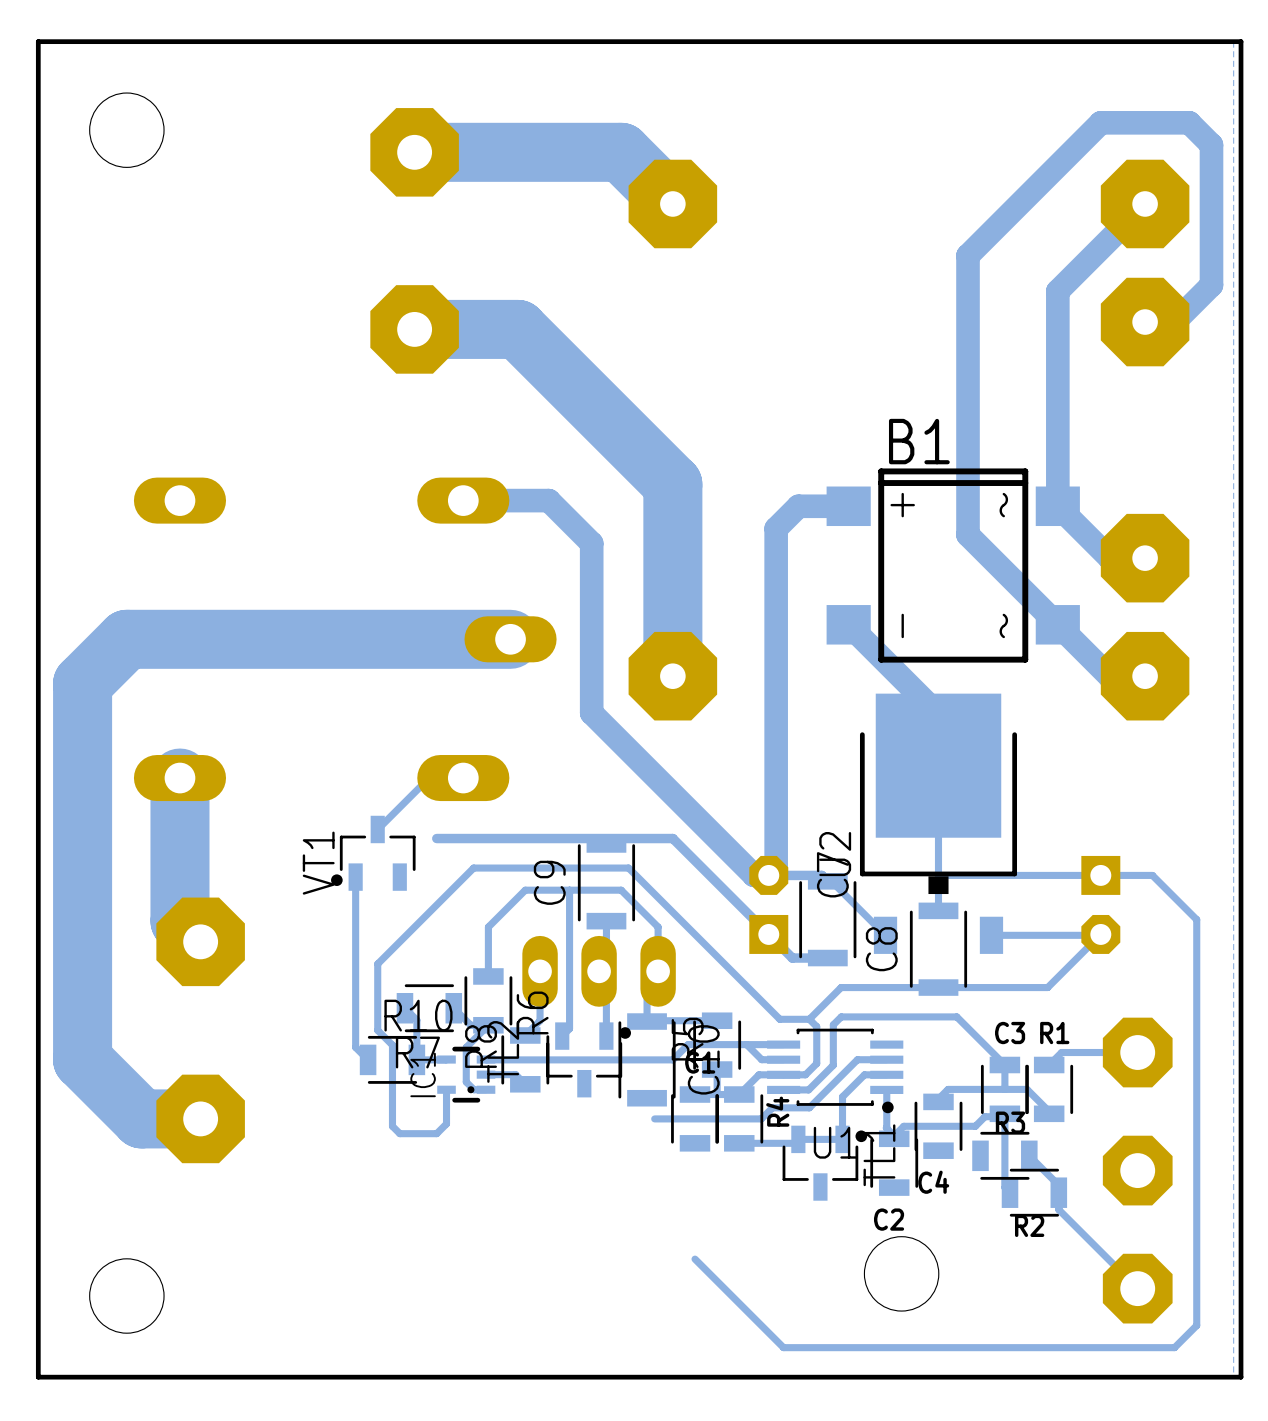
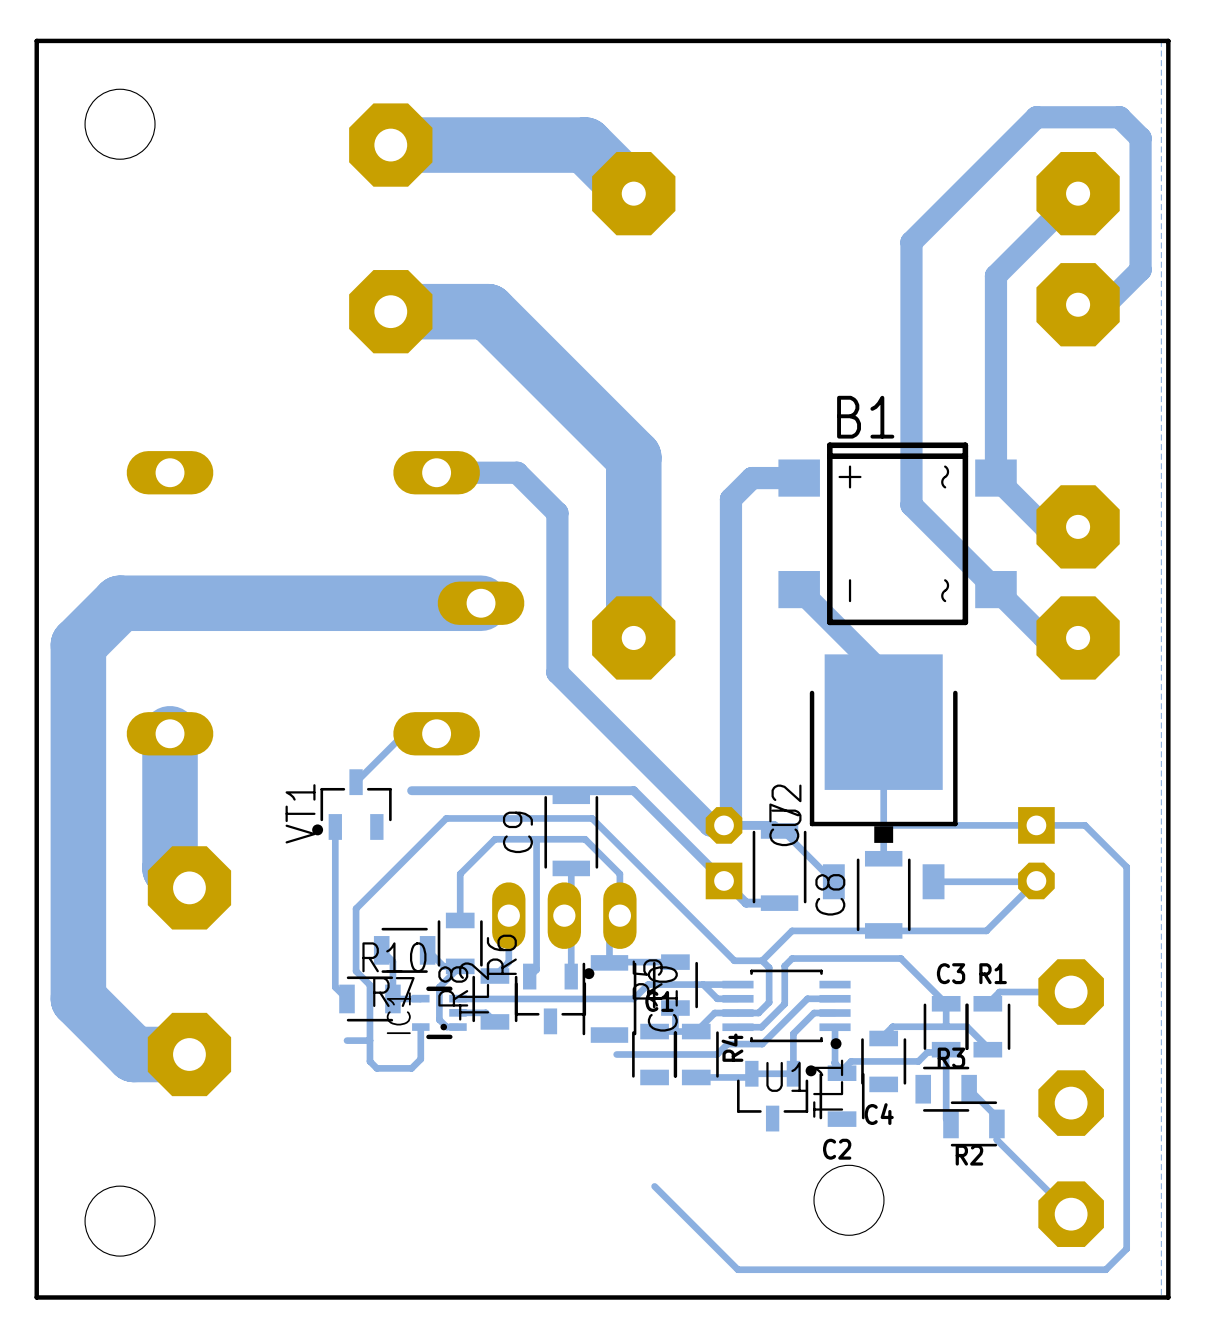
bottom track: none -> (369, 1040) (347, 1040)

